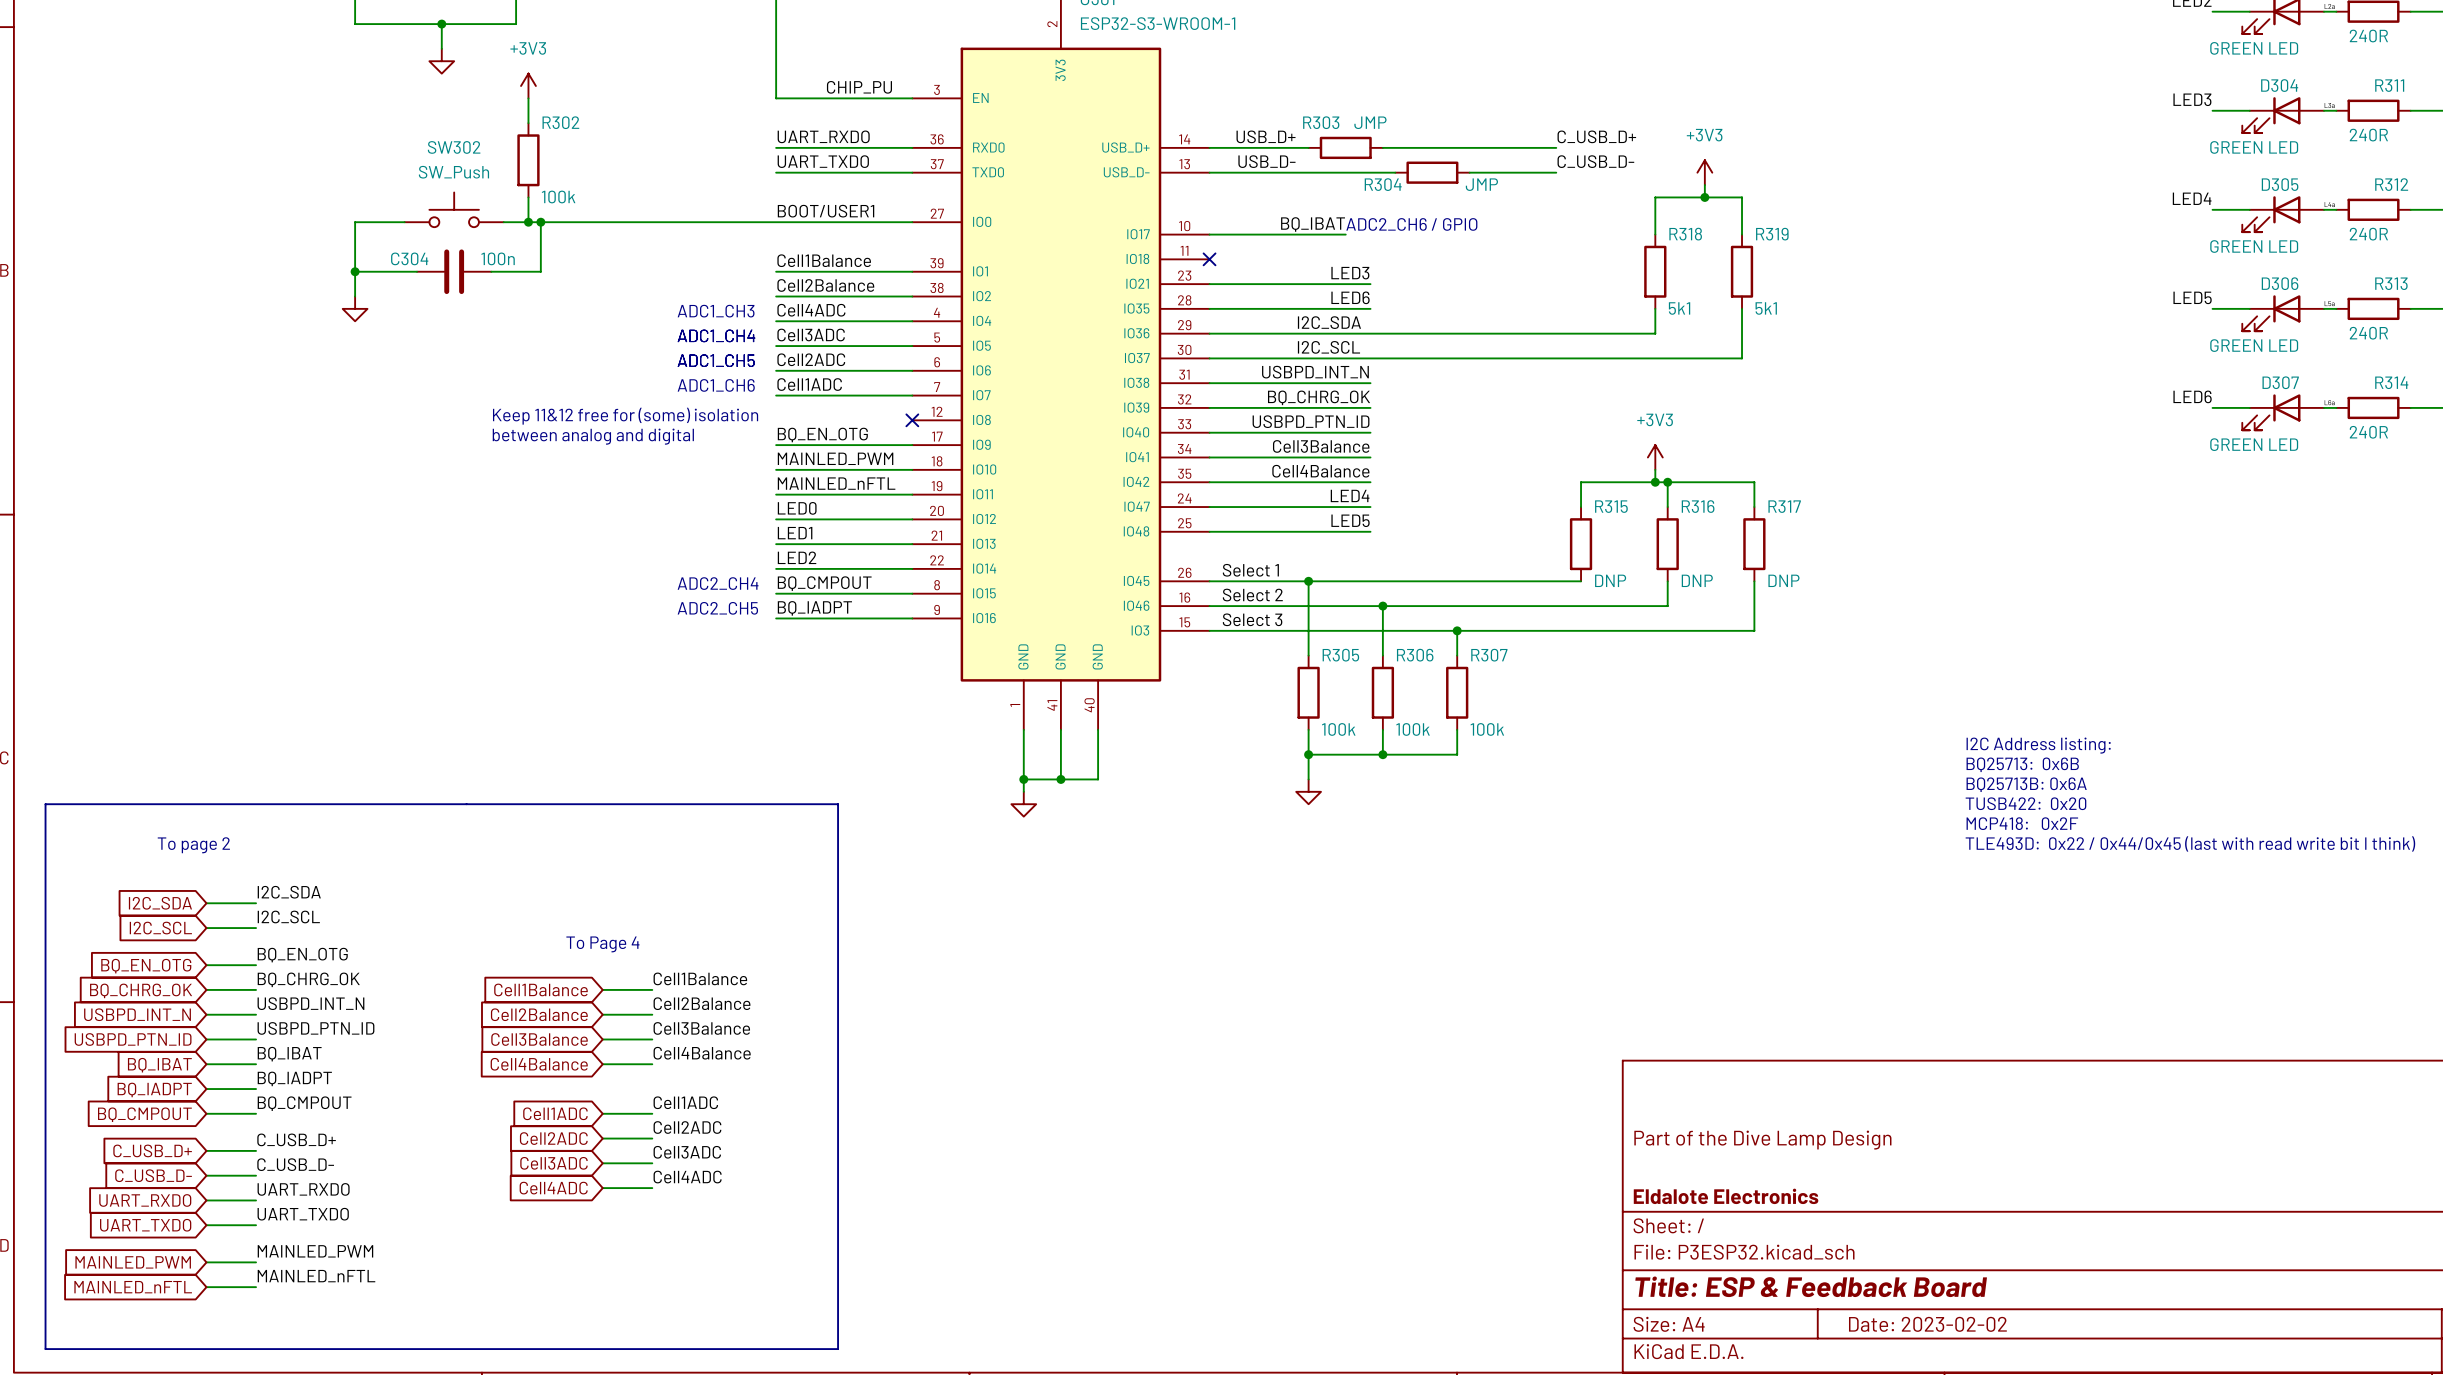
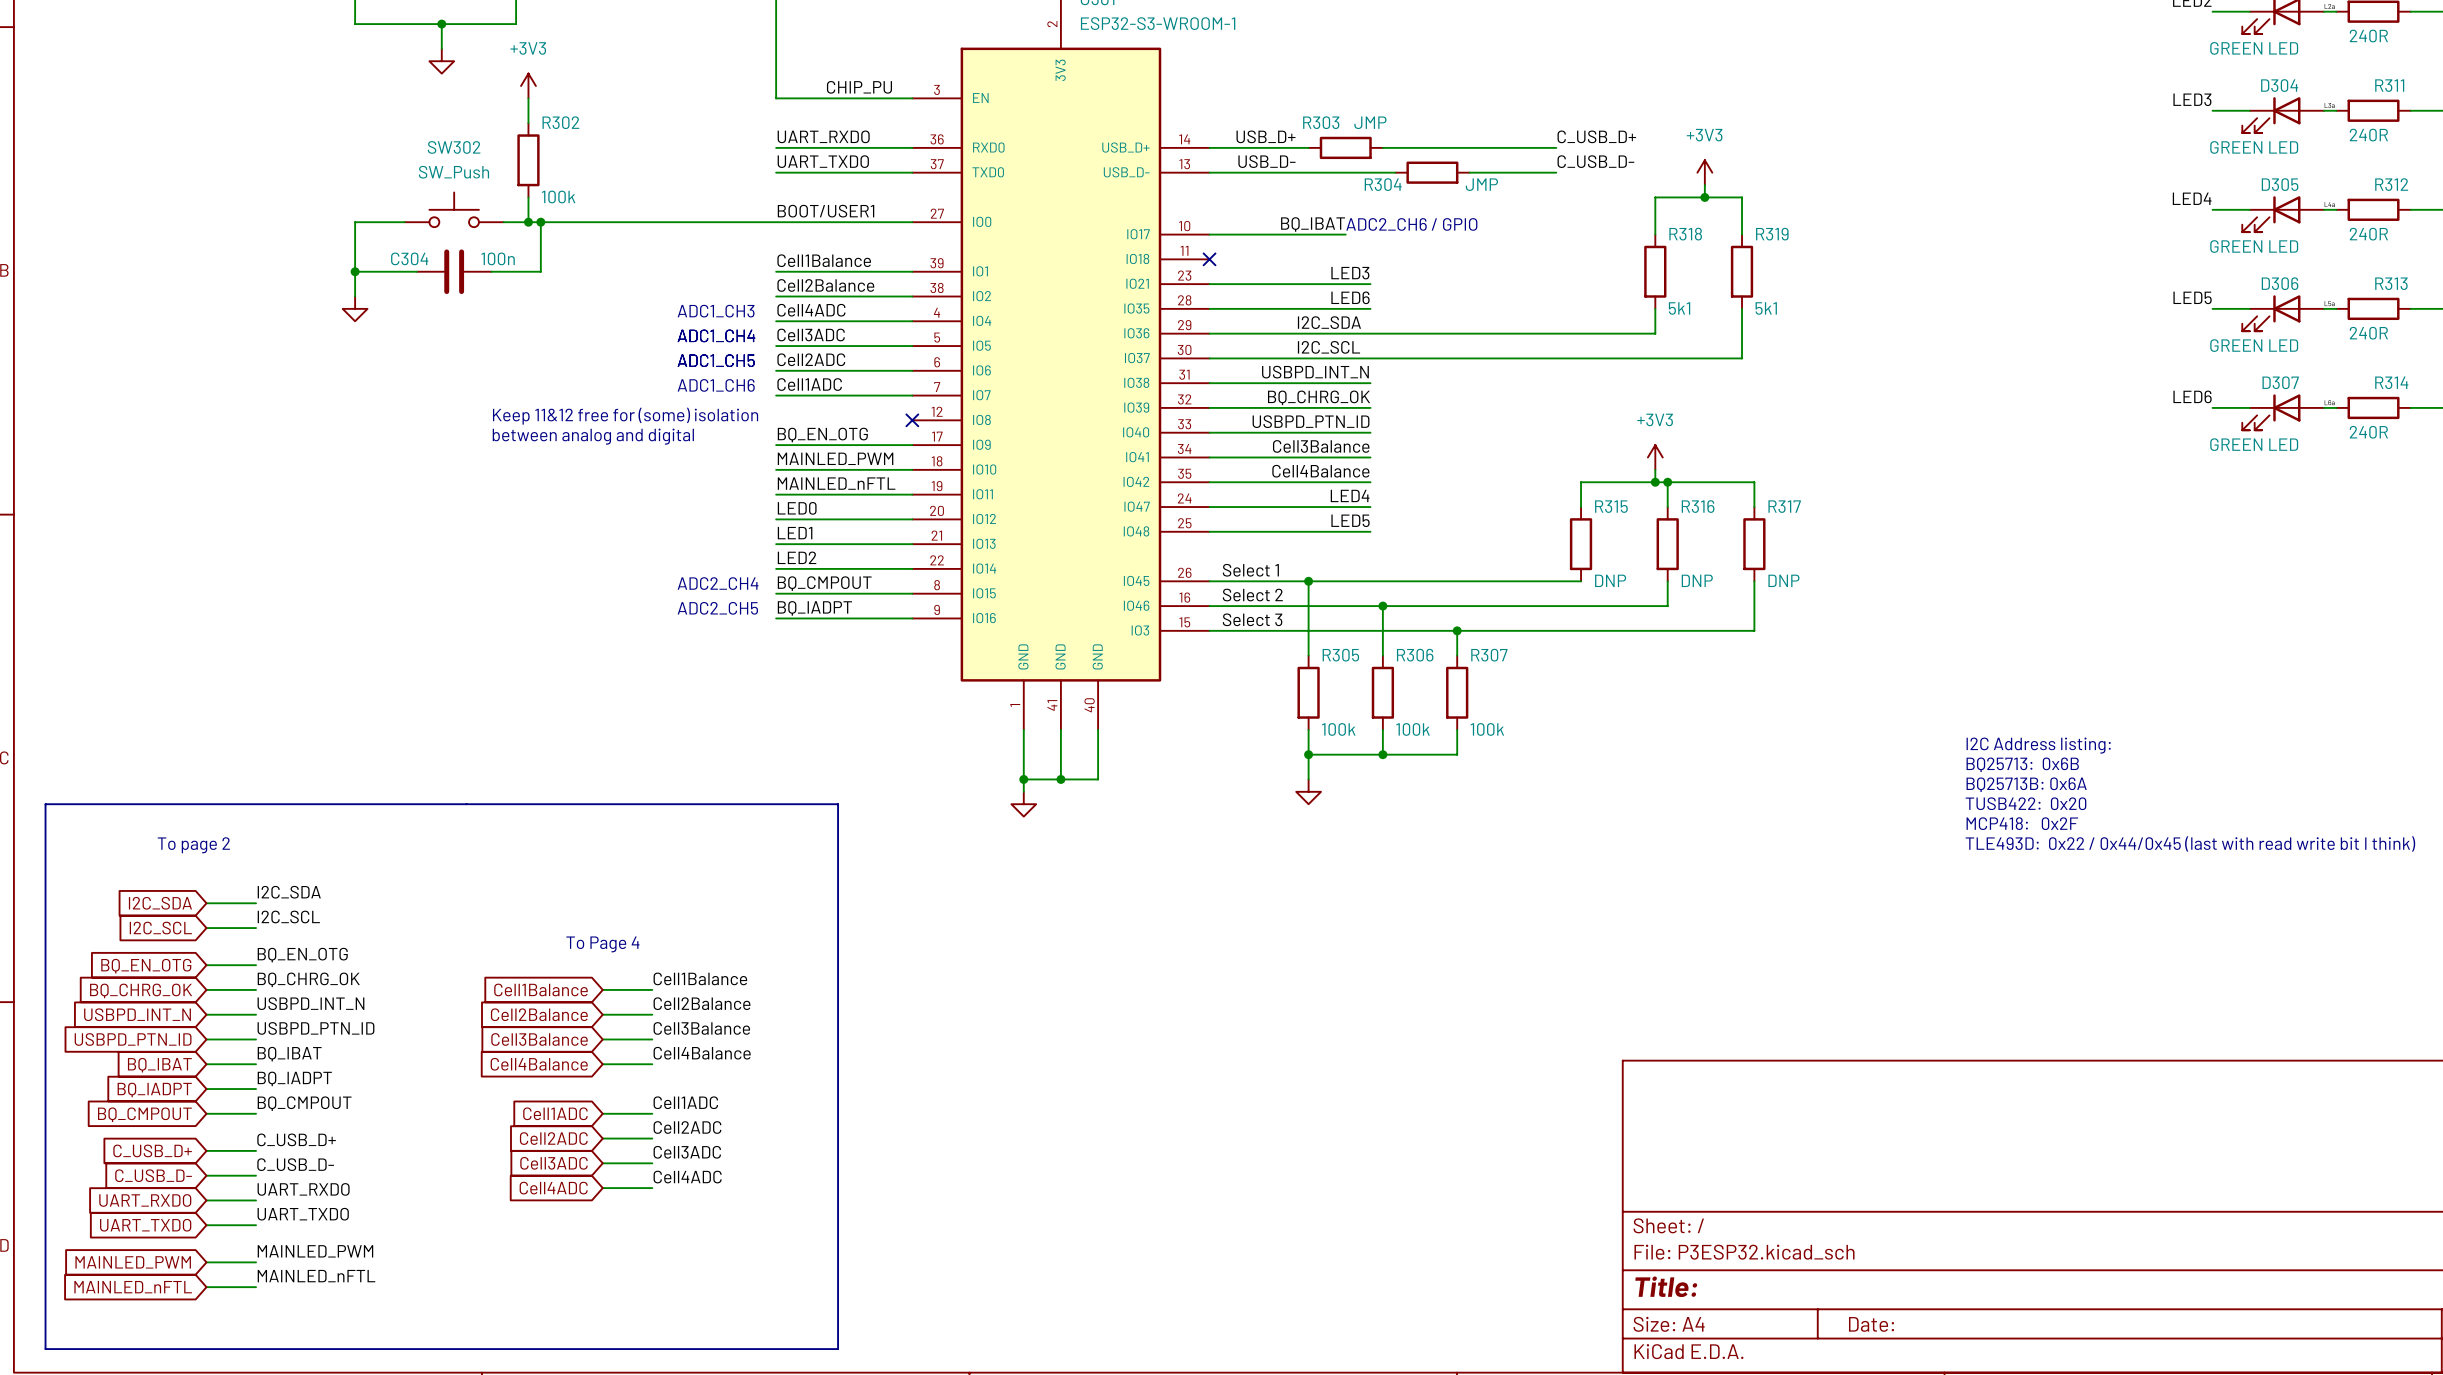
title block: Part of the Dive Lamp Design (1762, 1140) -> none
title block: Eldalote Electronics (1726, 1196) -> none
title block: Title: ESP & Feedback Board (1811, 1286) -> Title: (1666, 1286)
title block: Date: 2023-02-02 (1927, 1324) -> Date: (1871, 1324)

